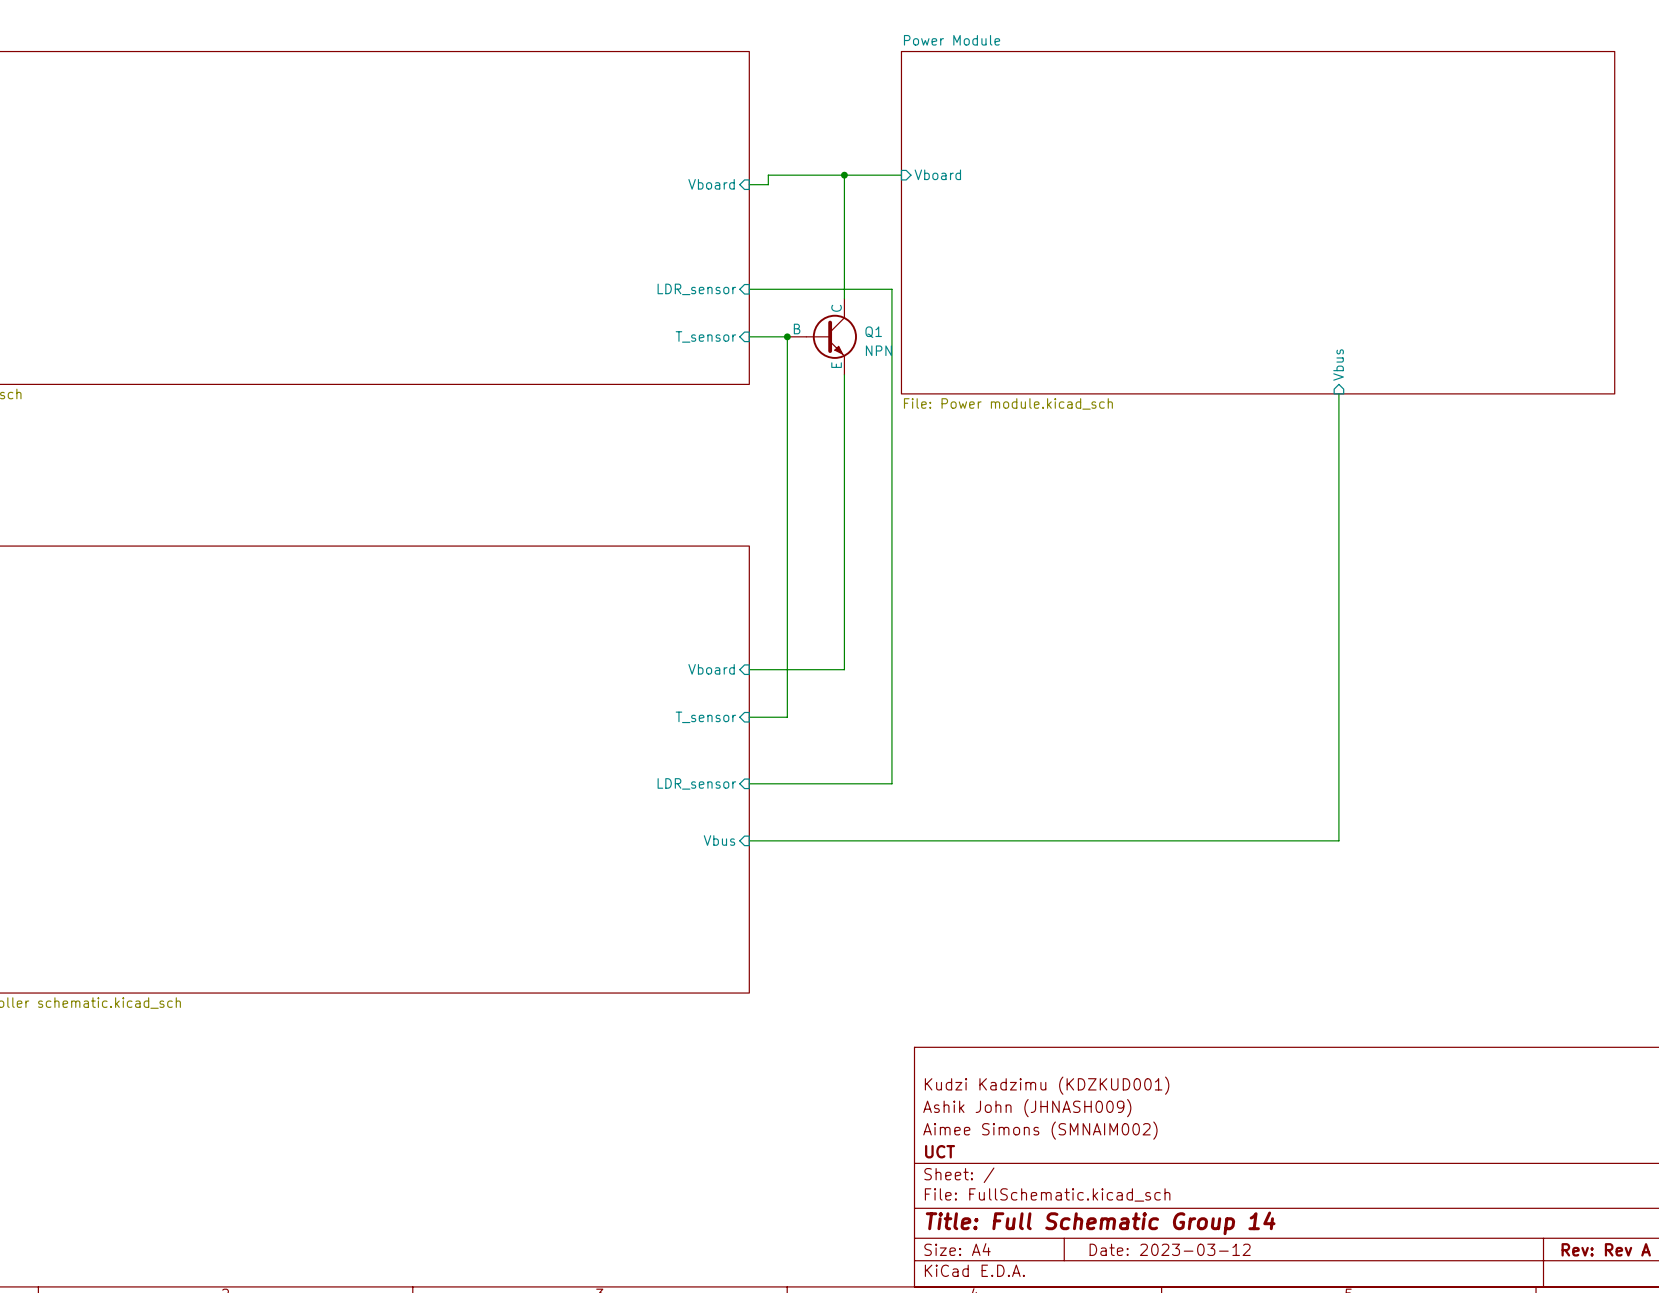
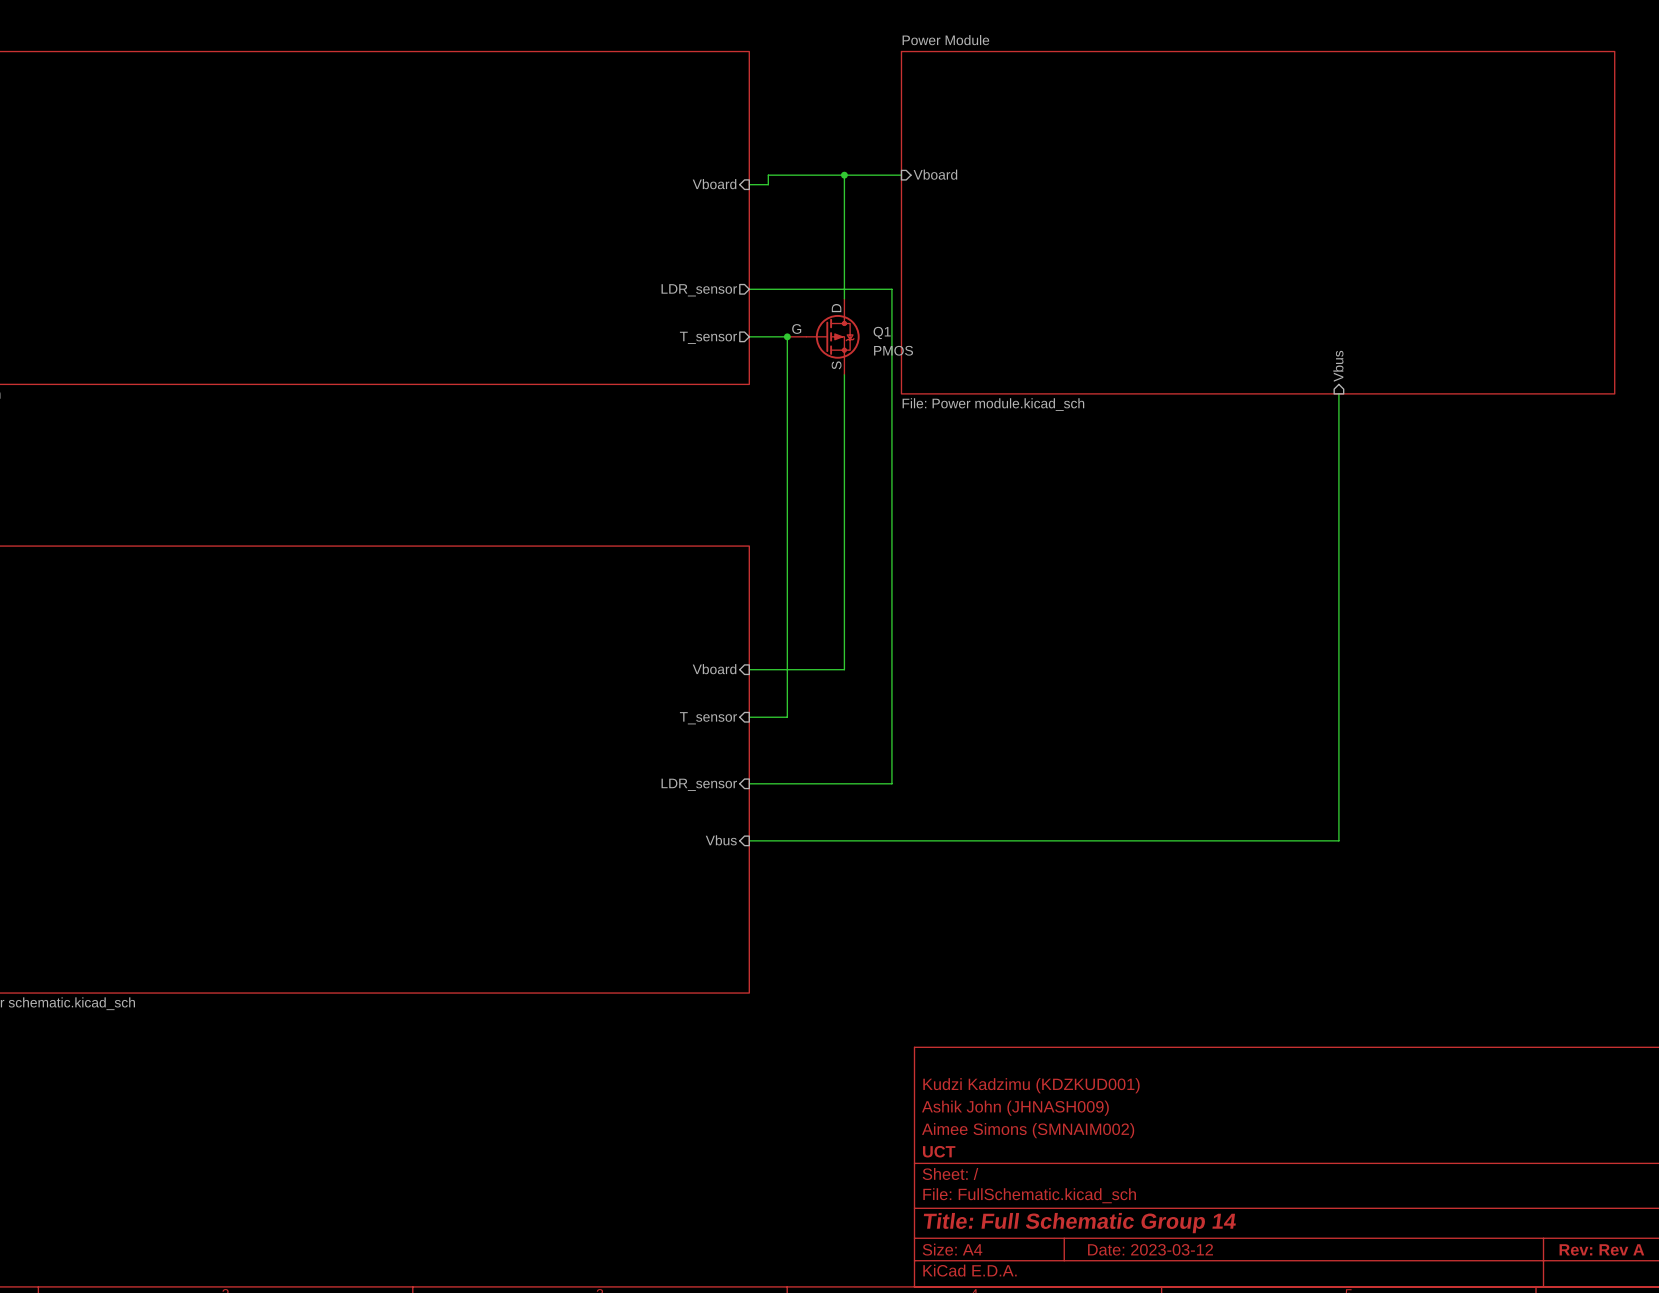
sheet pin shape: input (696, 289) -> output (699, 290)
Q1 symbol: [787, 298, 857, 375] -> [787, 298, 860, 375]
sheet pin shape: input (705, 336) -> output (708, 337)
Q1 value: NPN (878, 350) -> PMOS (893, 350)

